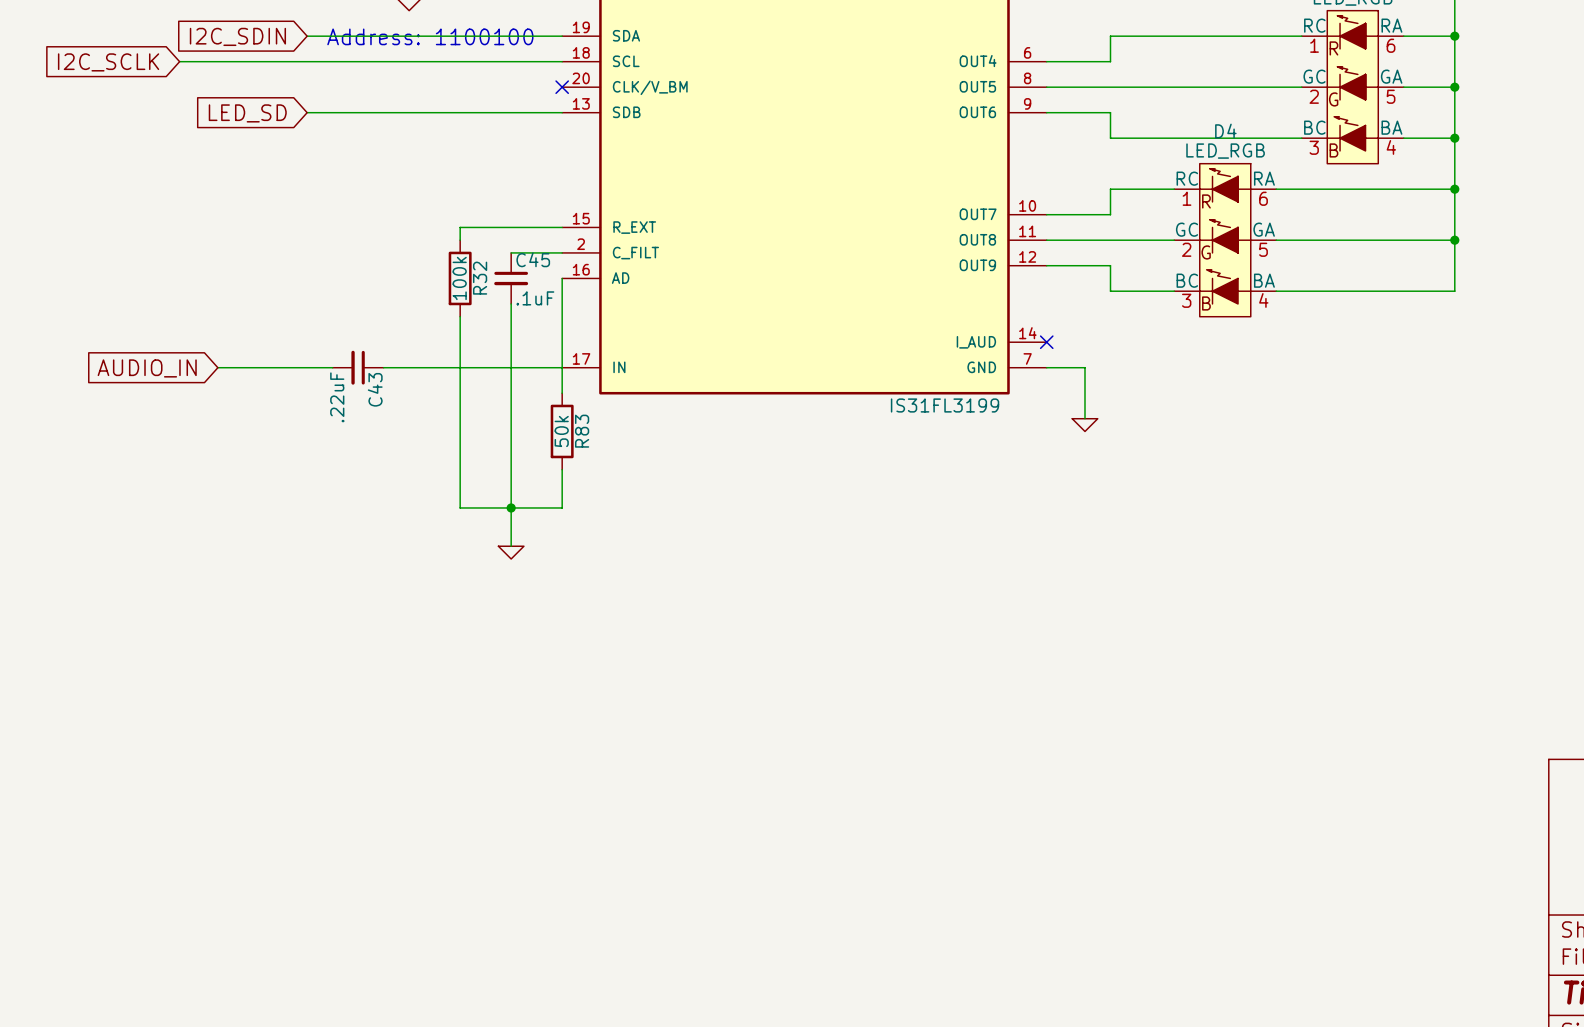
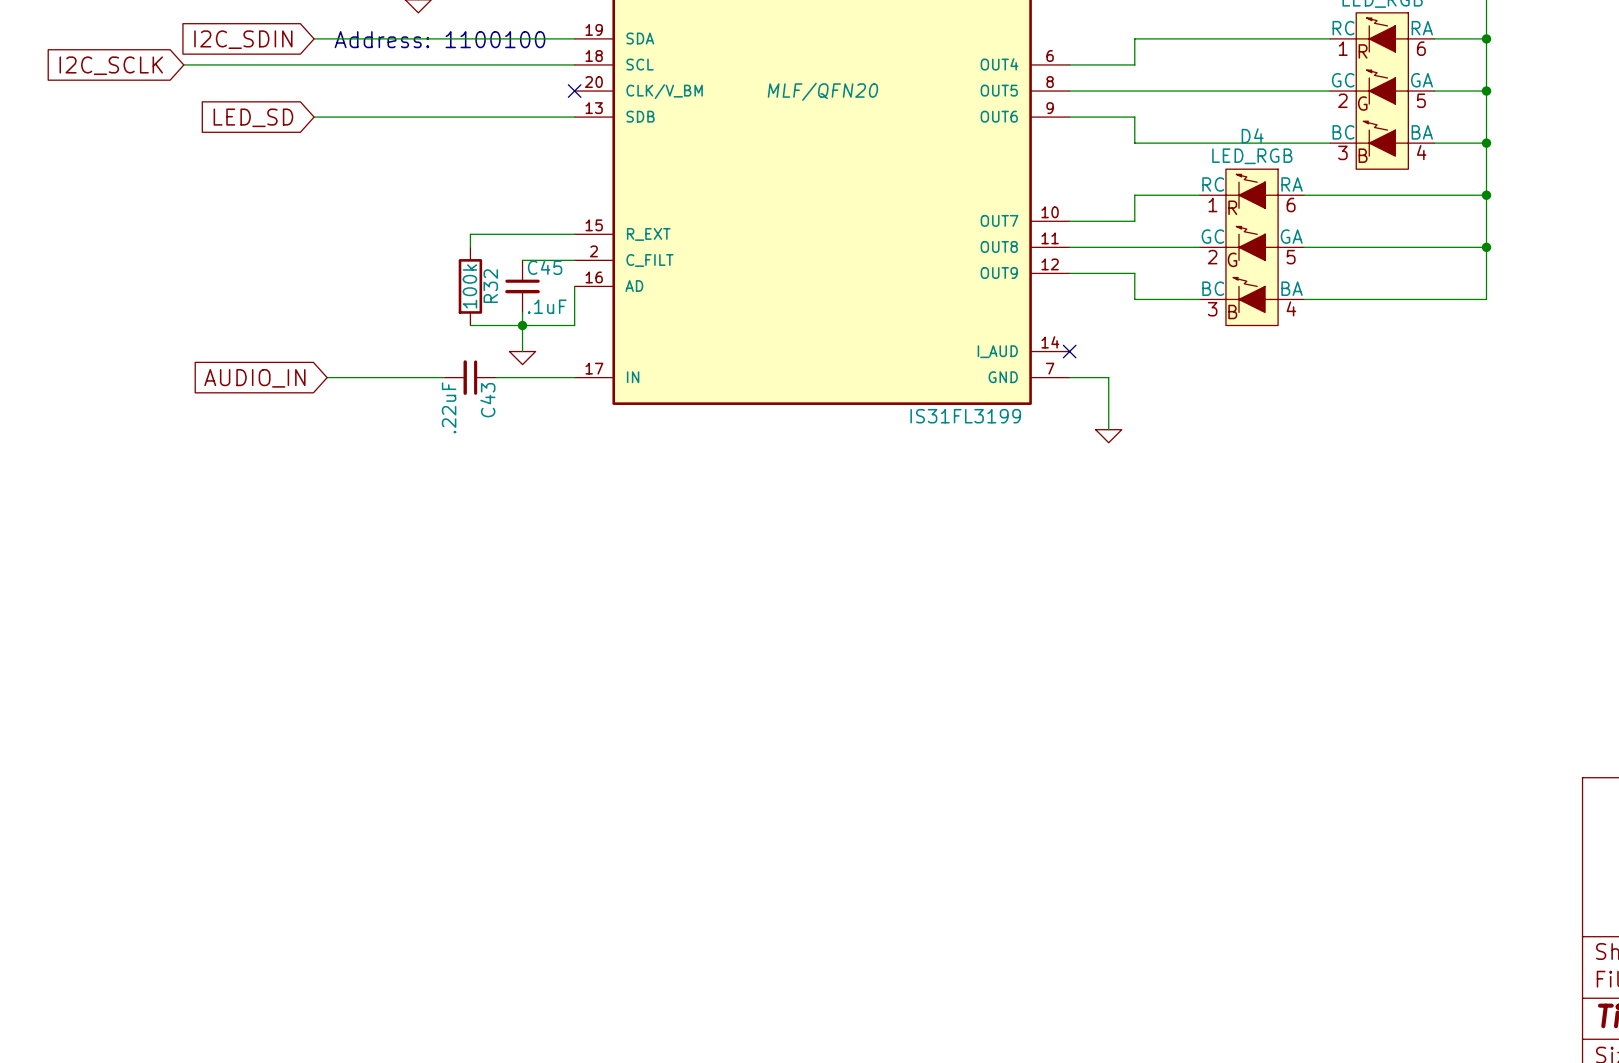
part text: none -> MLF/QFN20 (822, 91)
wire: (460, 316) (460, 507) (562, 507) (562, 469) -> none
junction: none -> (522, 325)
wire: (562, 316) (562, 393) -> (574, 325) (470, 325)
wire: (511, 342) (511, 546) -> none
wire: (217, 367) (319, 367) -> none
C43 position: (358, 367) -> (470, 377)
global label position: AUDIO_IN (147, 368) -> AUDIO_IN (254, 378)
R83: 50k (562, 431) -> none
junction: (511, 507) -> none
power symbol position: (511, 552) -> (522, 358)

